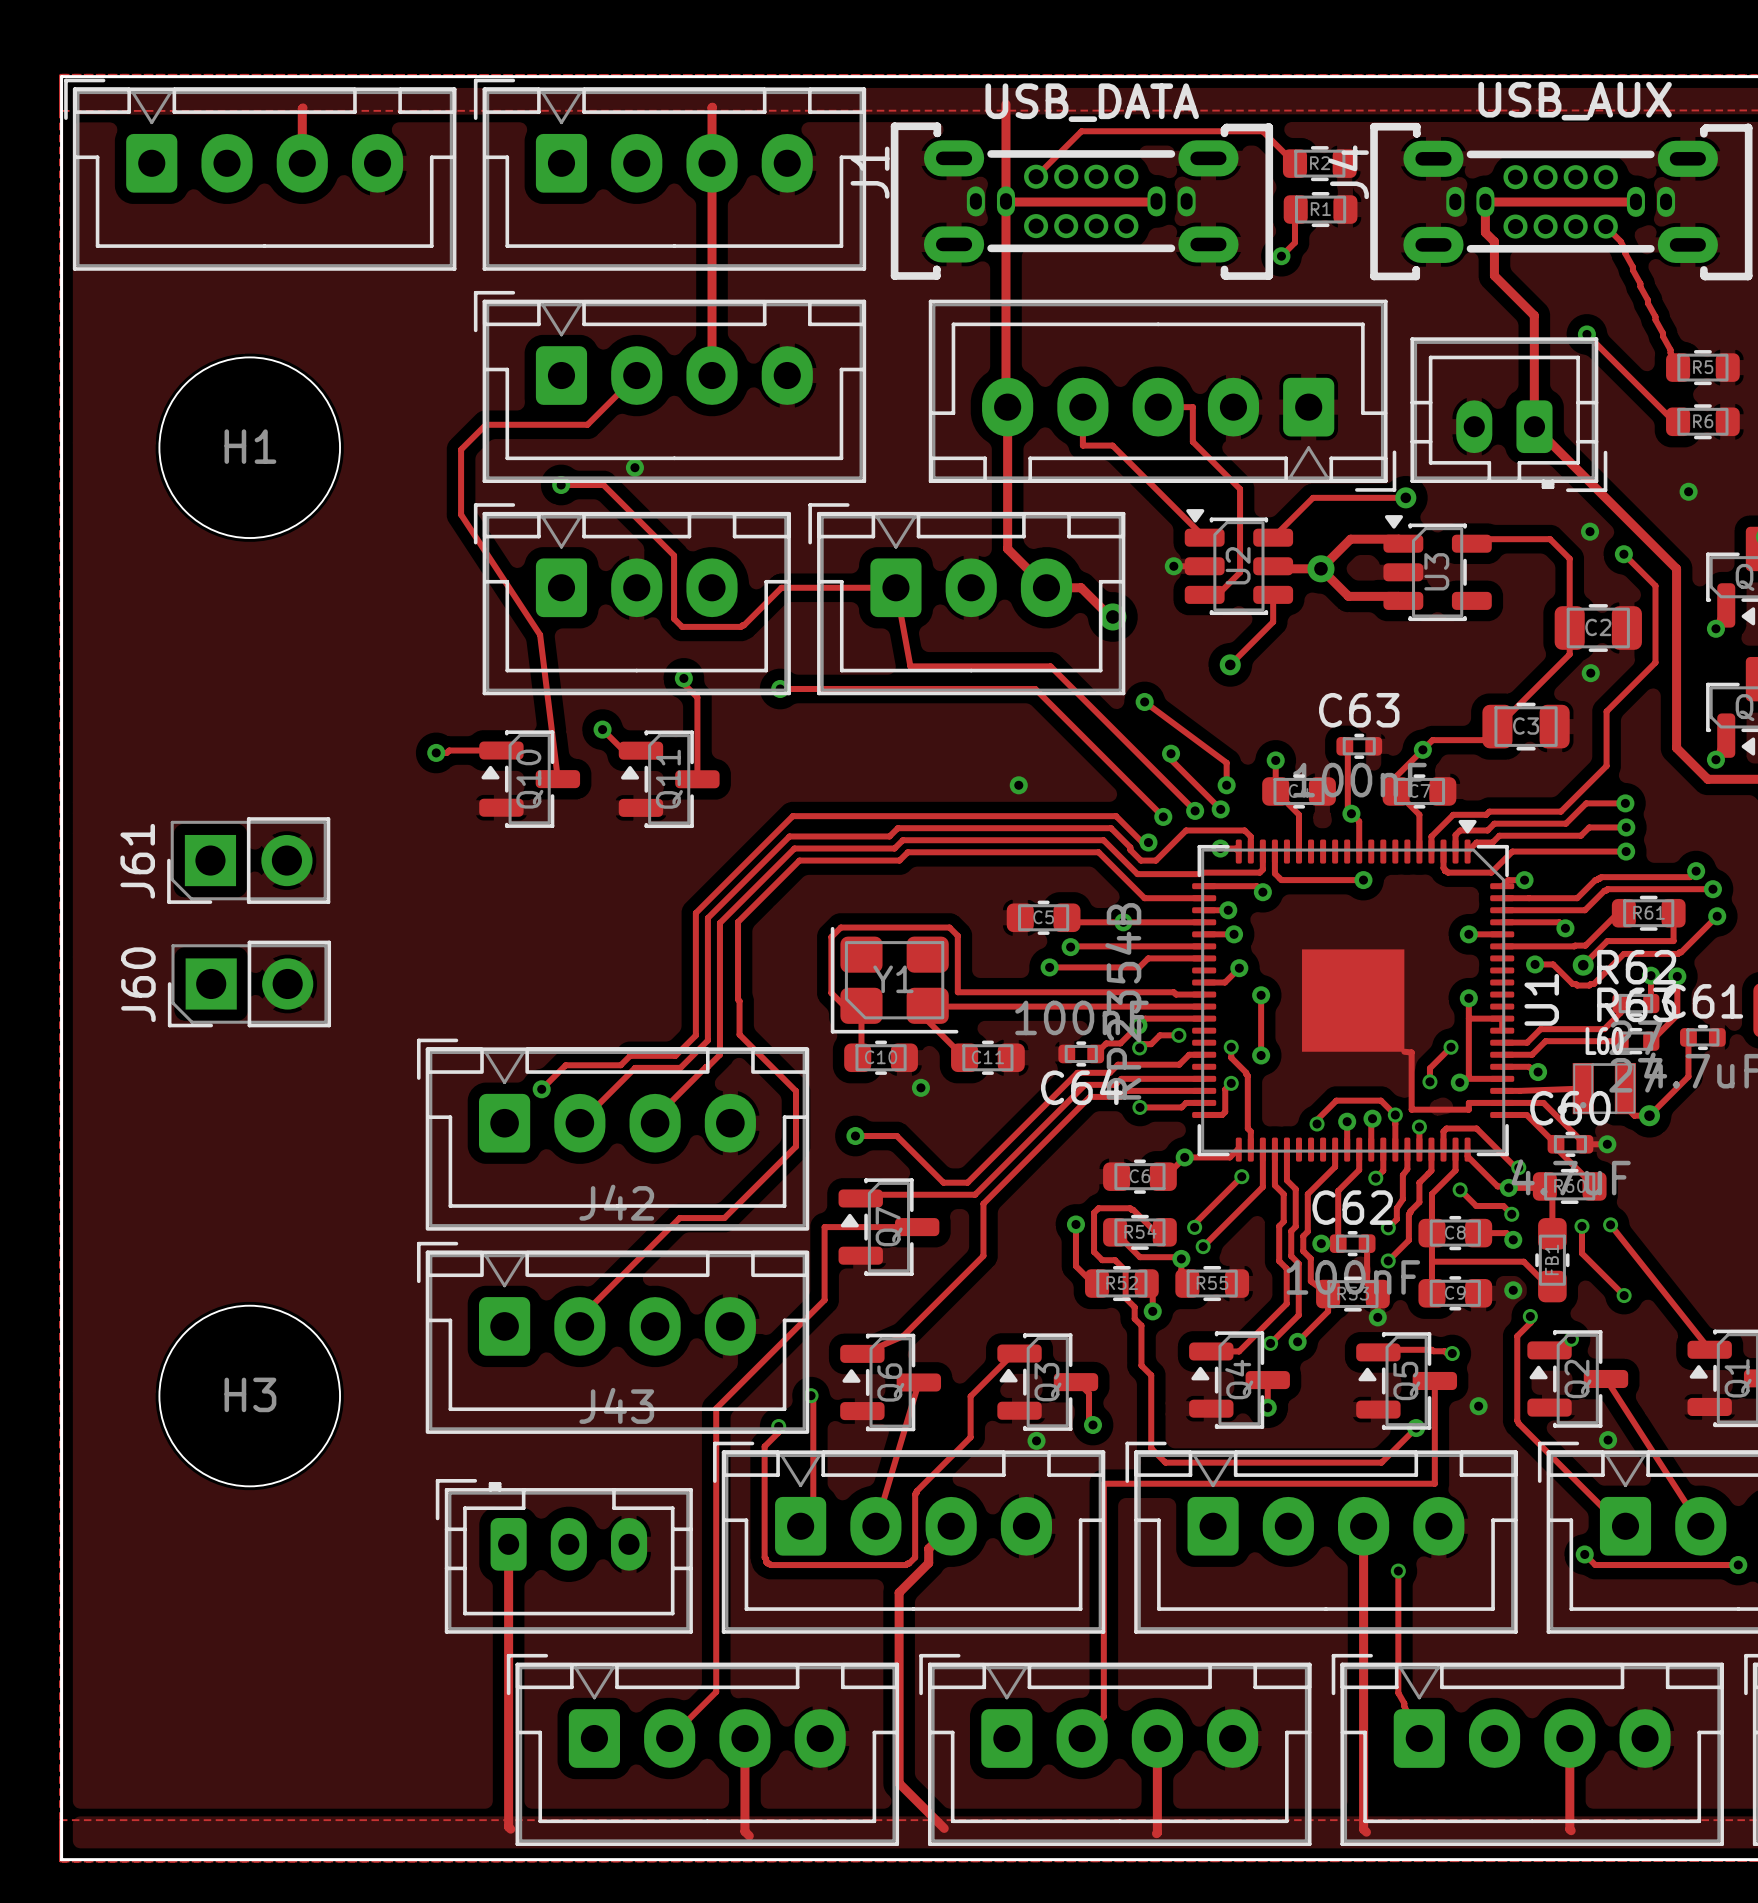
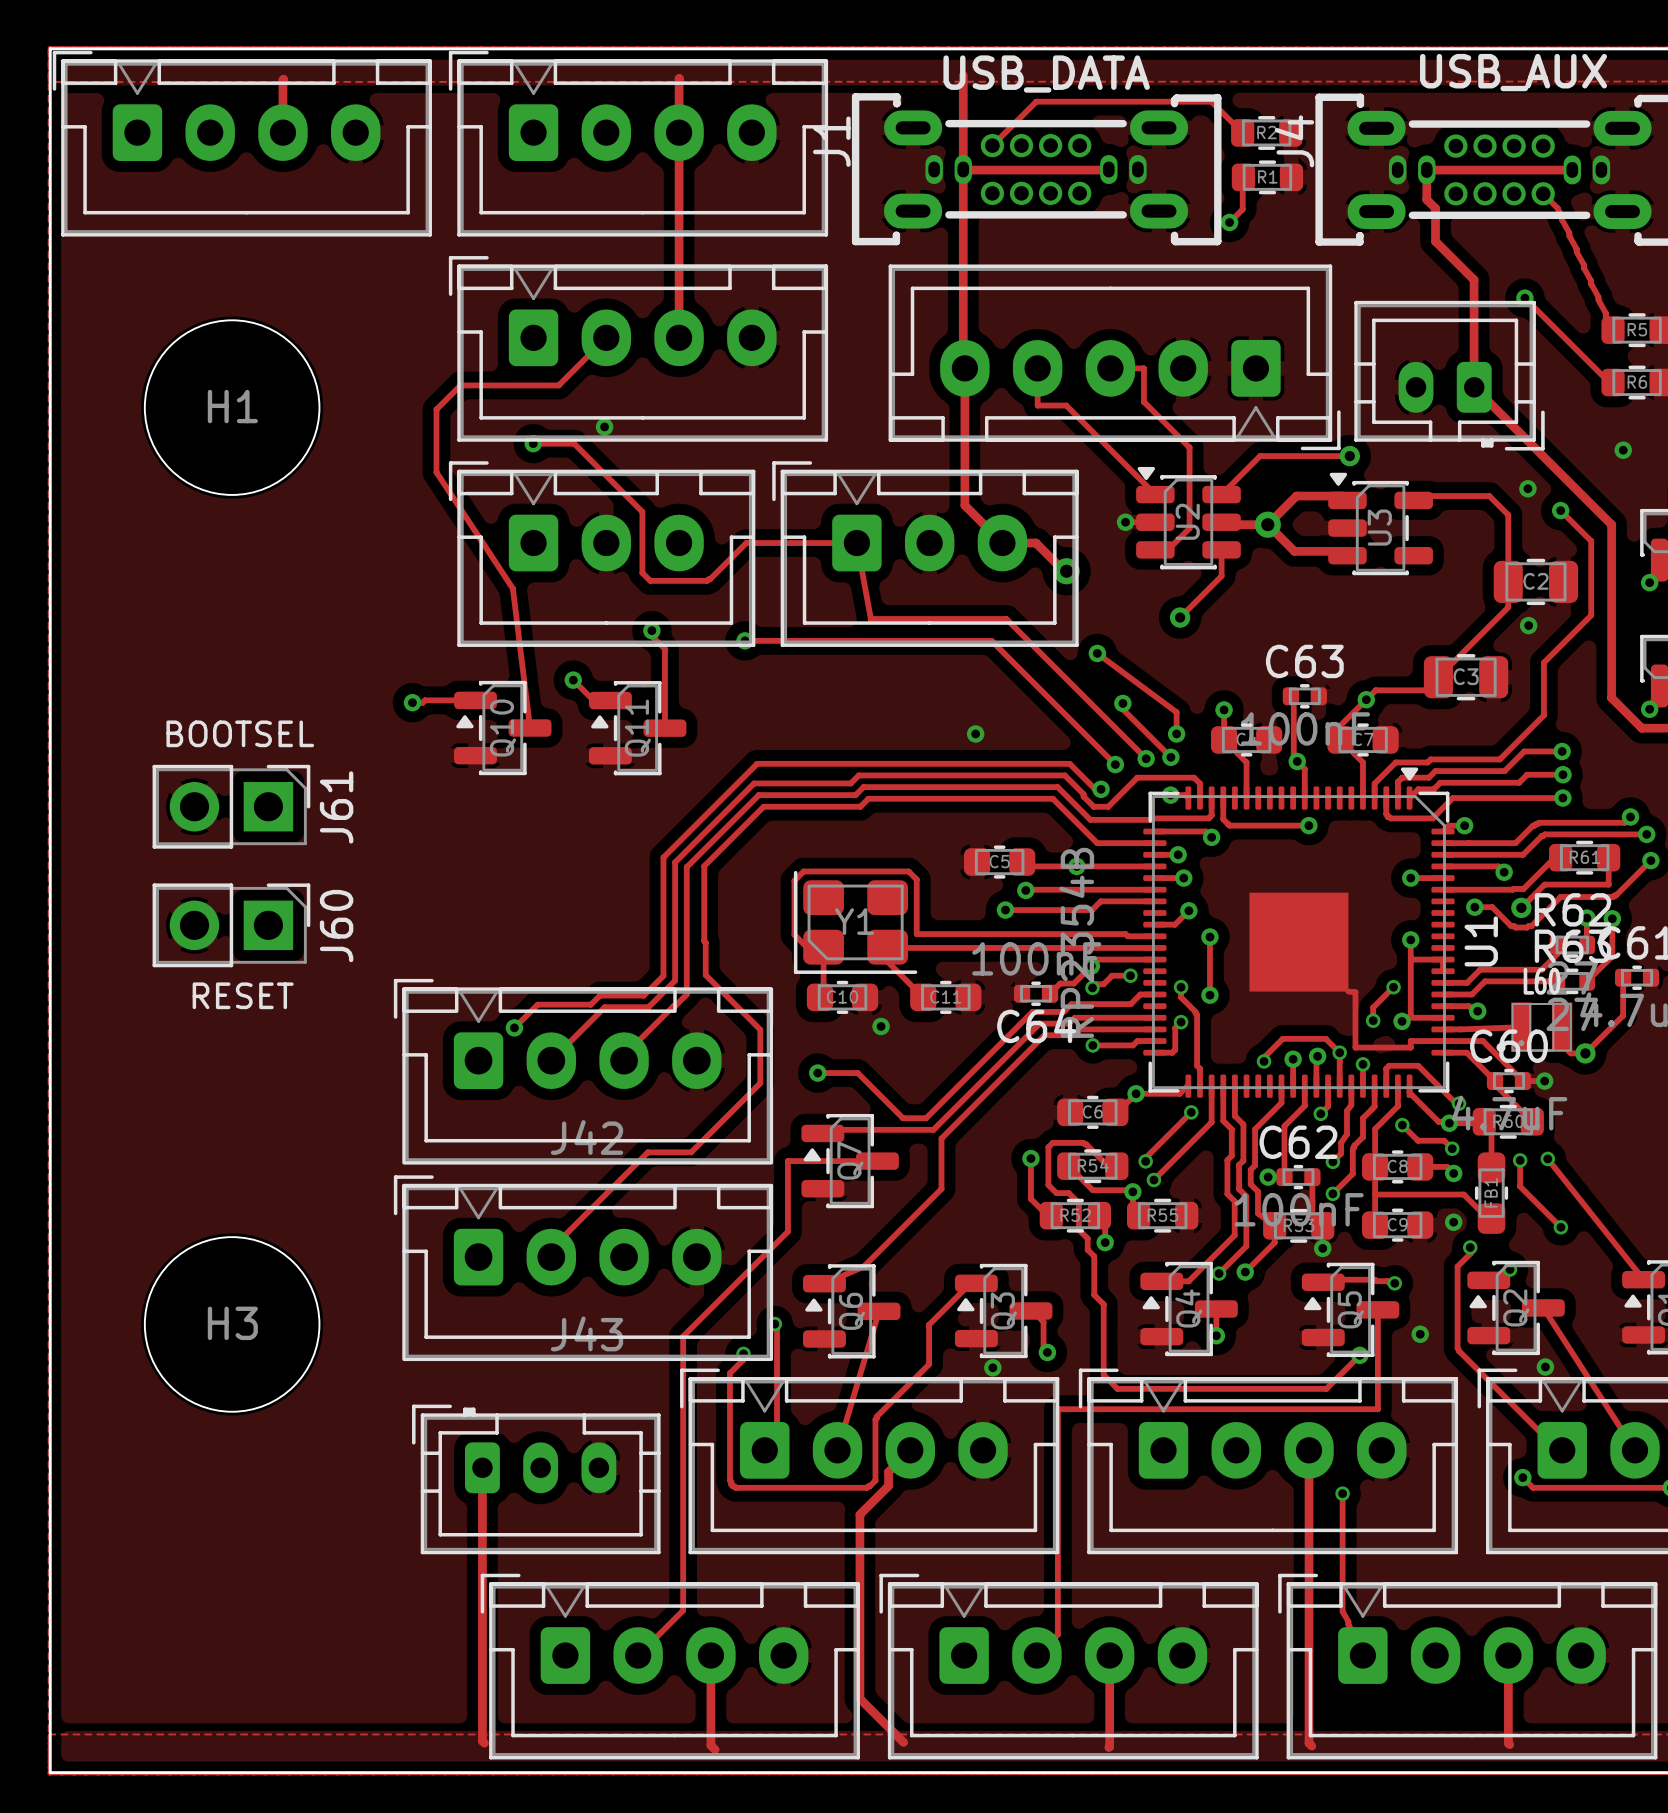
text: none -> BOOTSEL (240, 733)
J61 rotation: 0° (248, 860) -> 180° (231, 806)
J60 rotation: 0° (249, 983) -> 180° (231, 925)
text: none -> RESET (243, 995)

